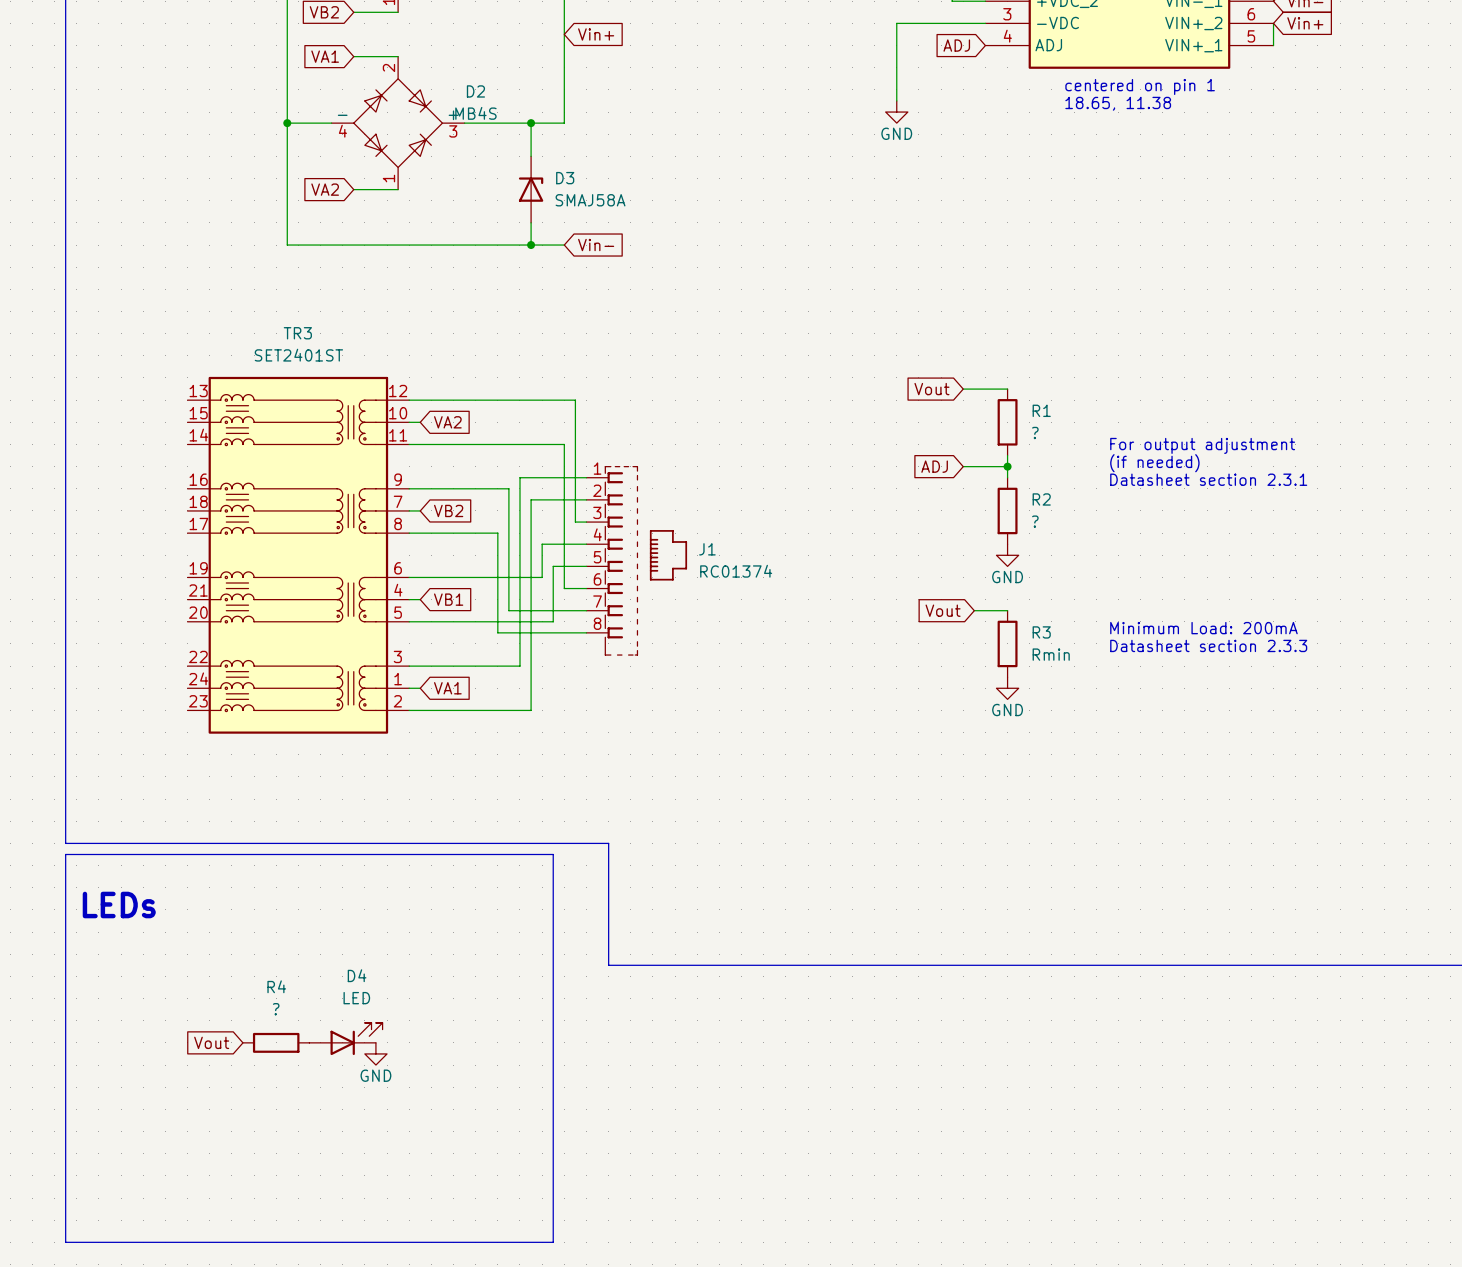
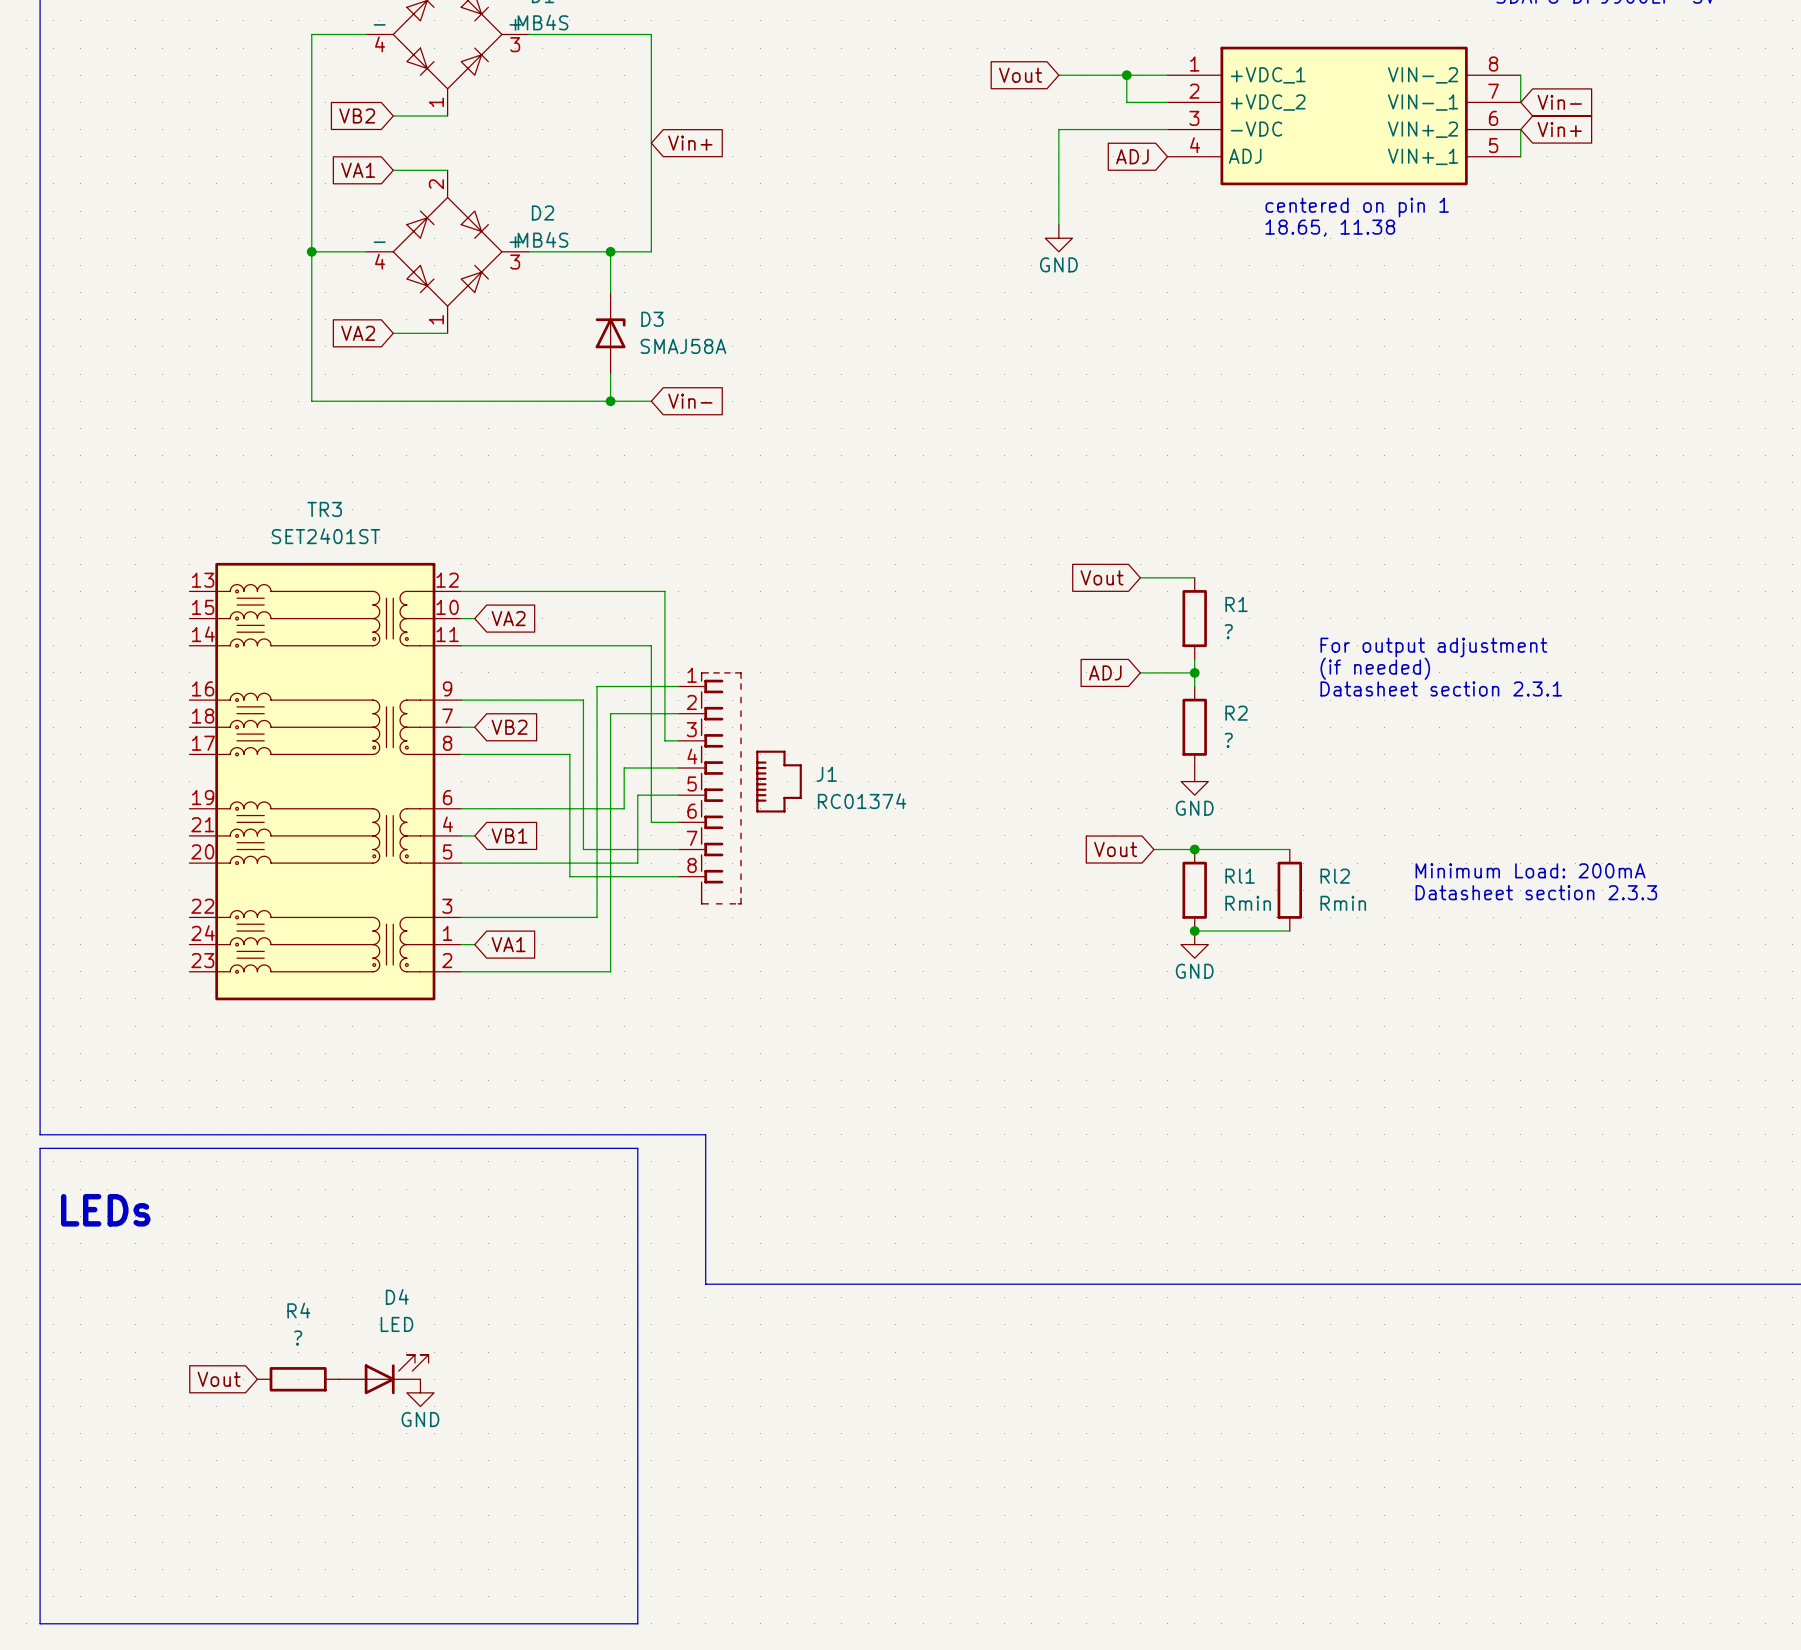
wire: none -> (1194, 849) (1289, 849)
junction: none -> (1194, 849)
text position: Minimum Load: 200mA (1203, 628) -> Minimum Load: 200mA (1530, 870)
R3 name: R3 (1041, 632) -> Rl1 (1240, 876)
Rl2: none -> Rmin (1289, 890)
text position: Datasheet section 2.3.3 (1208, 645) -> Datasheet section 2.3.3 (1536, 892)
wire: none -> (1194, 931) (1289, 931)
junction: none -> (1194, 931)

